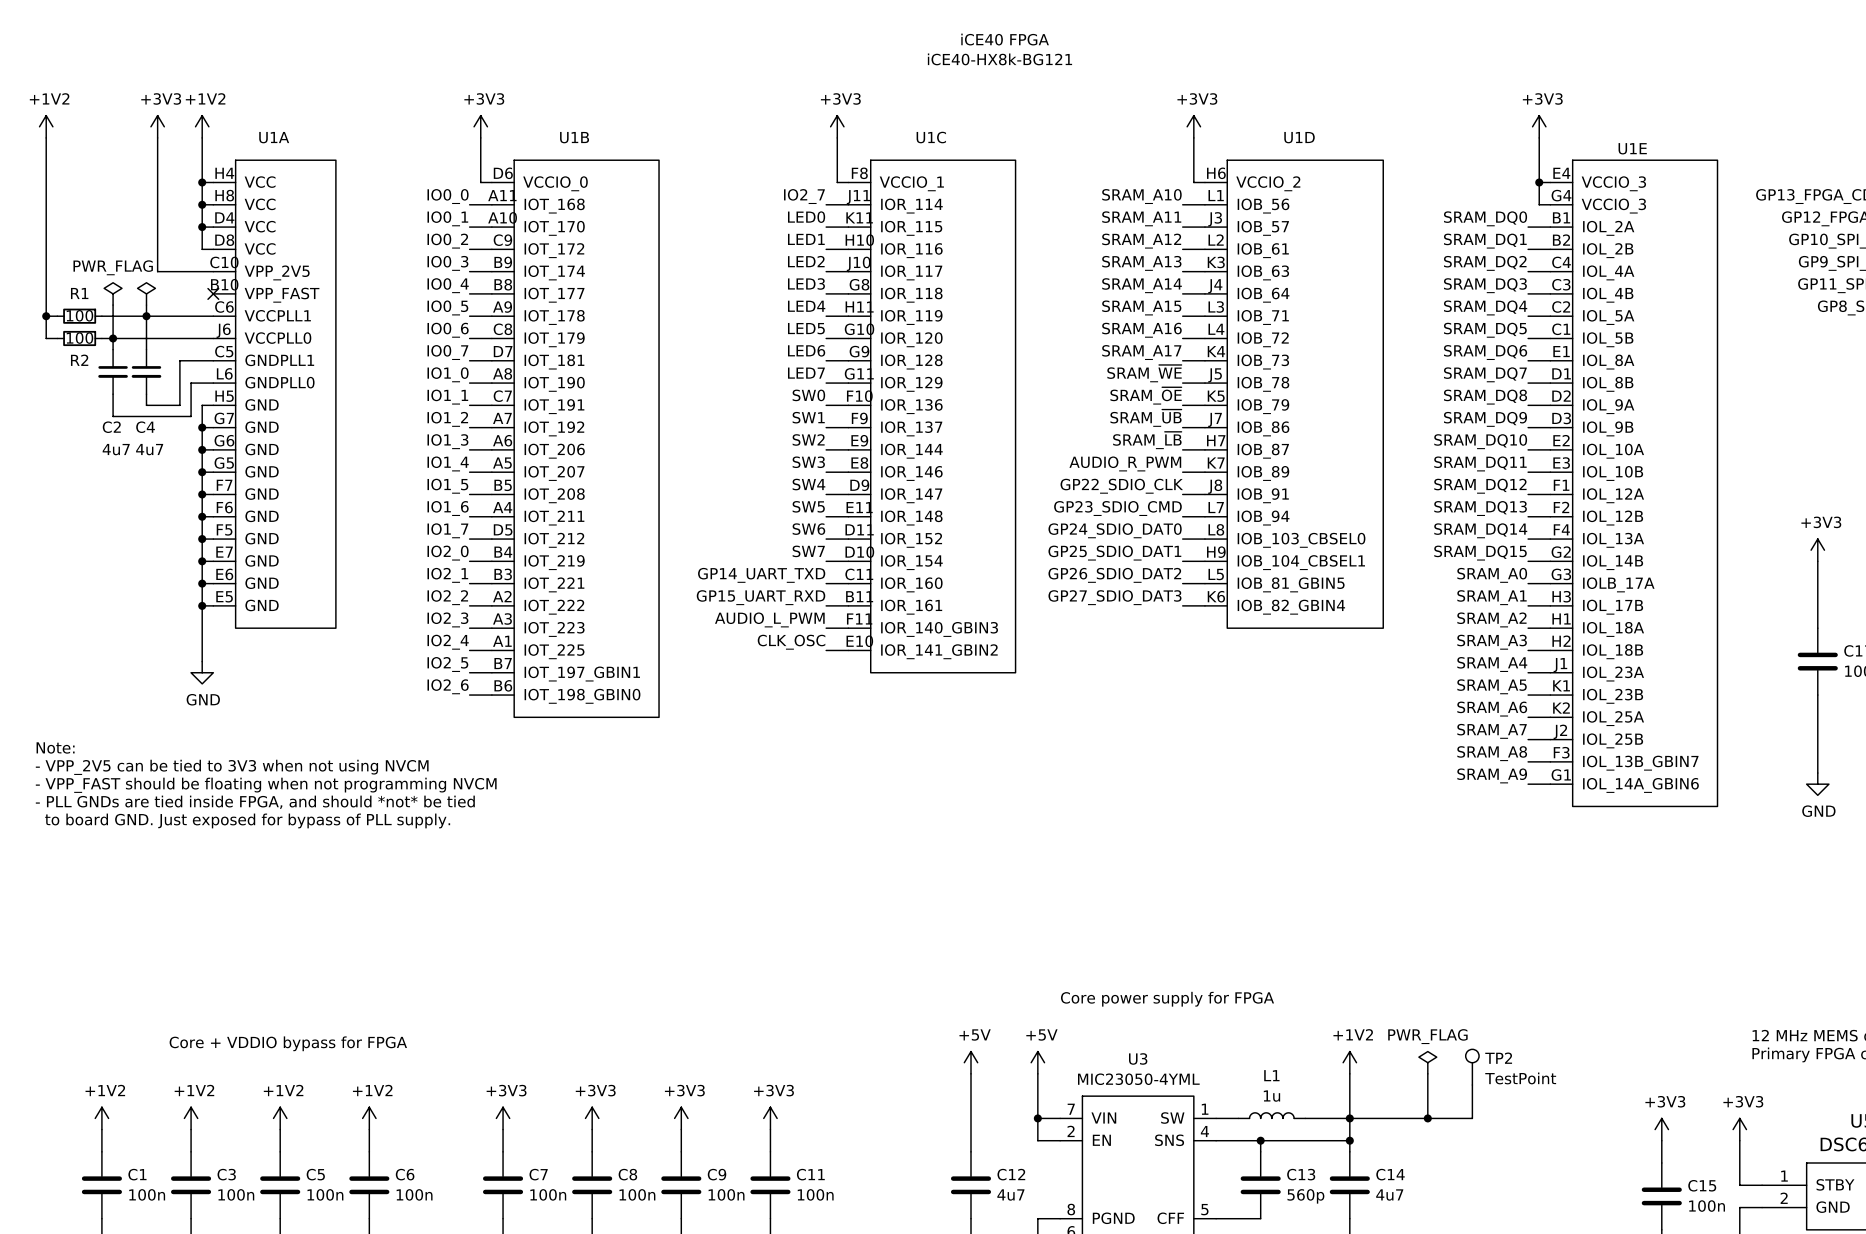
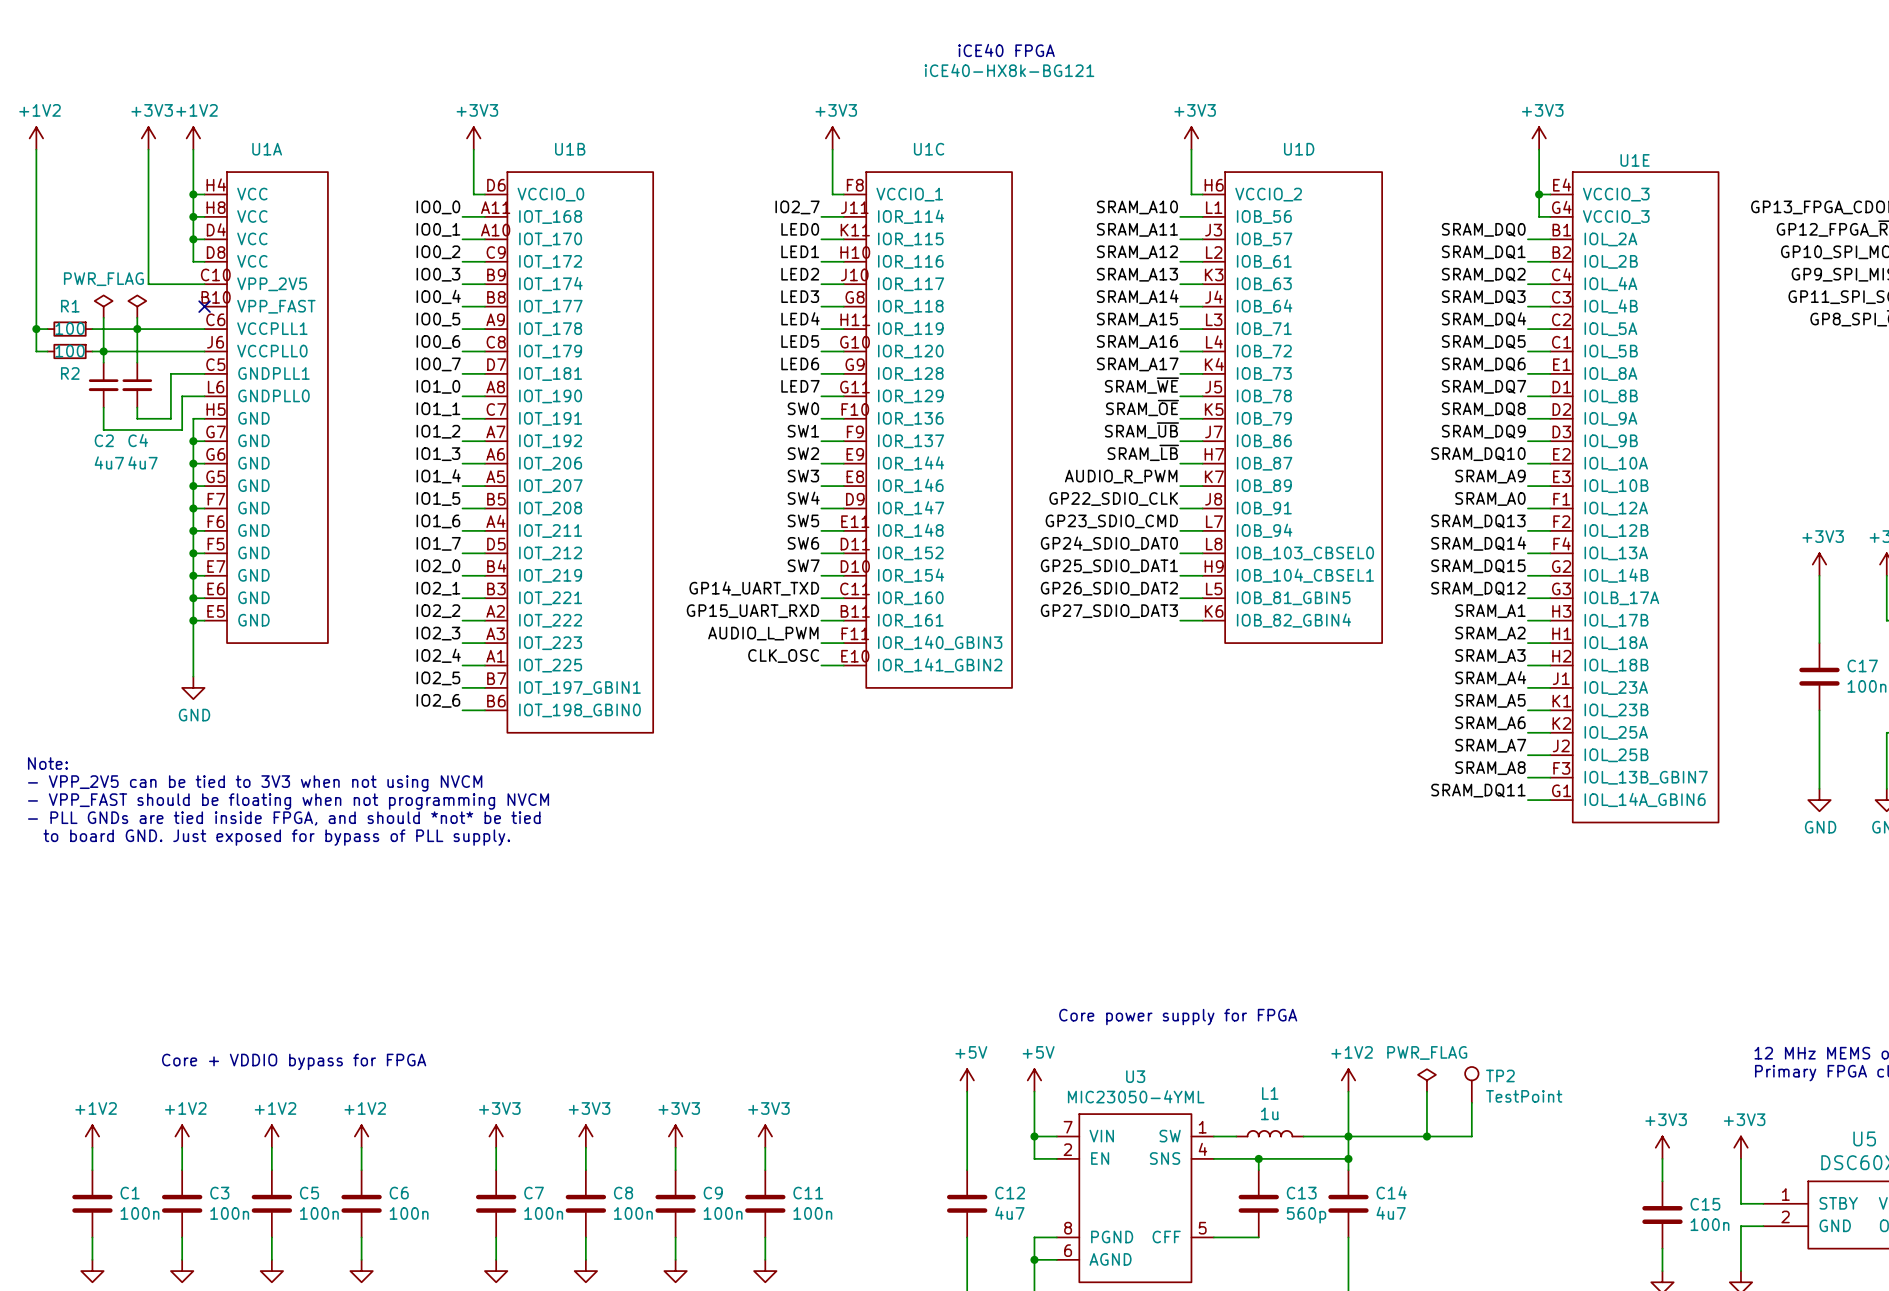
label: SRAM_DQ11 (1480, 463) -> SRAM_A9 (1490, 476)
label: SRAM_DQ12 (1480, 486) -> SRAM_A0 (1490, 499)
label: SRAM_A0 (1492, 575) -> SRAM_DQ12 (1478, 588)
label: SRAM_A9 (1492, 775) -> SRAM_DQ11 (1478, 790)

